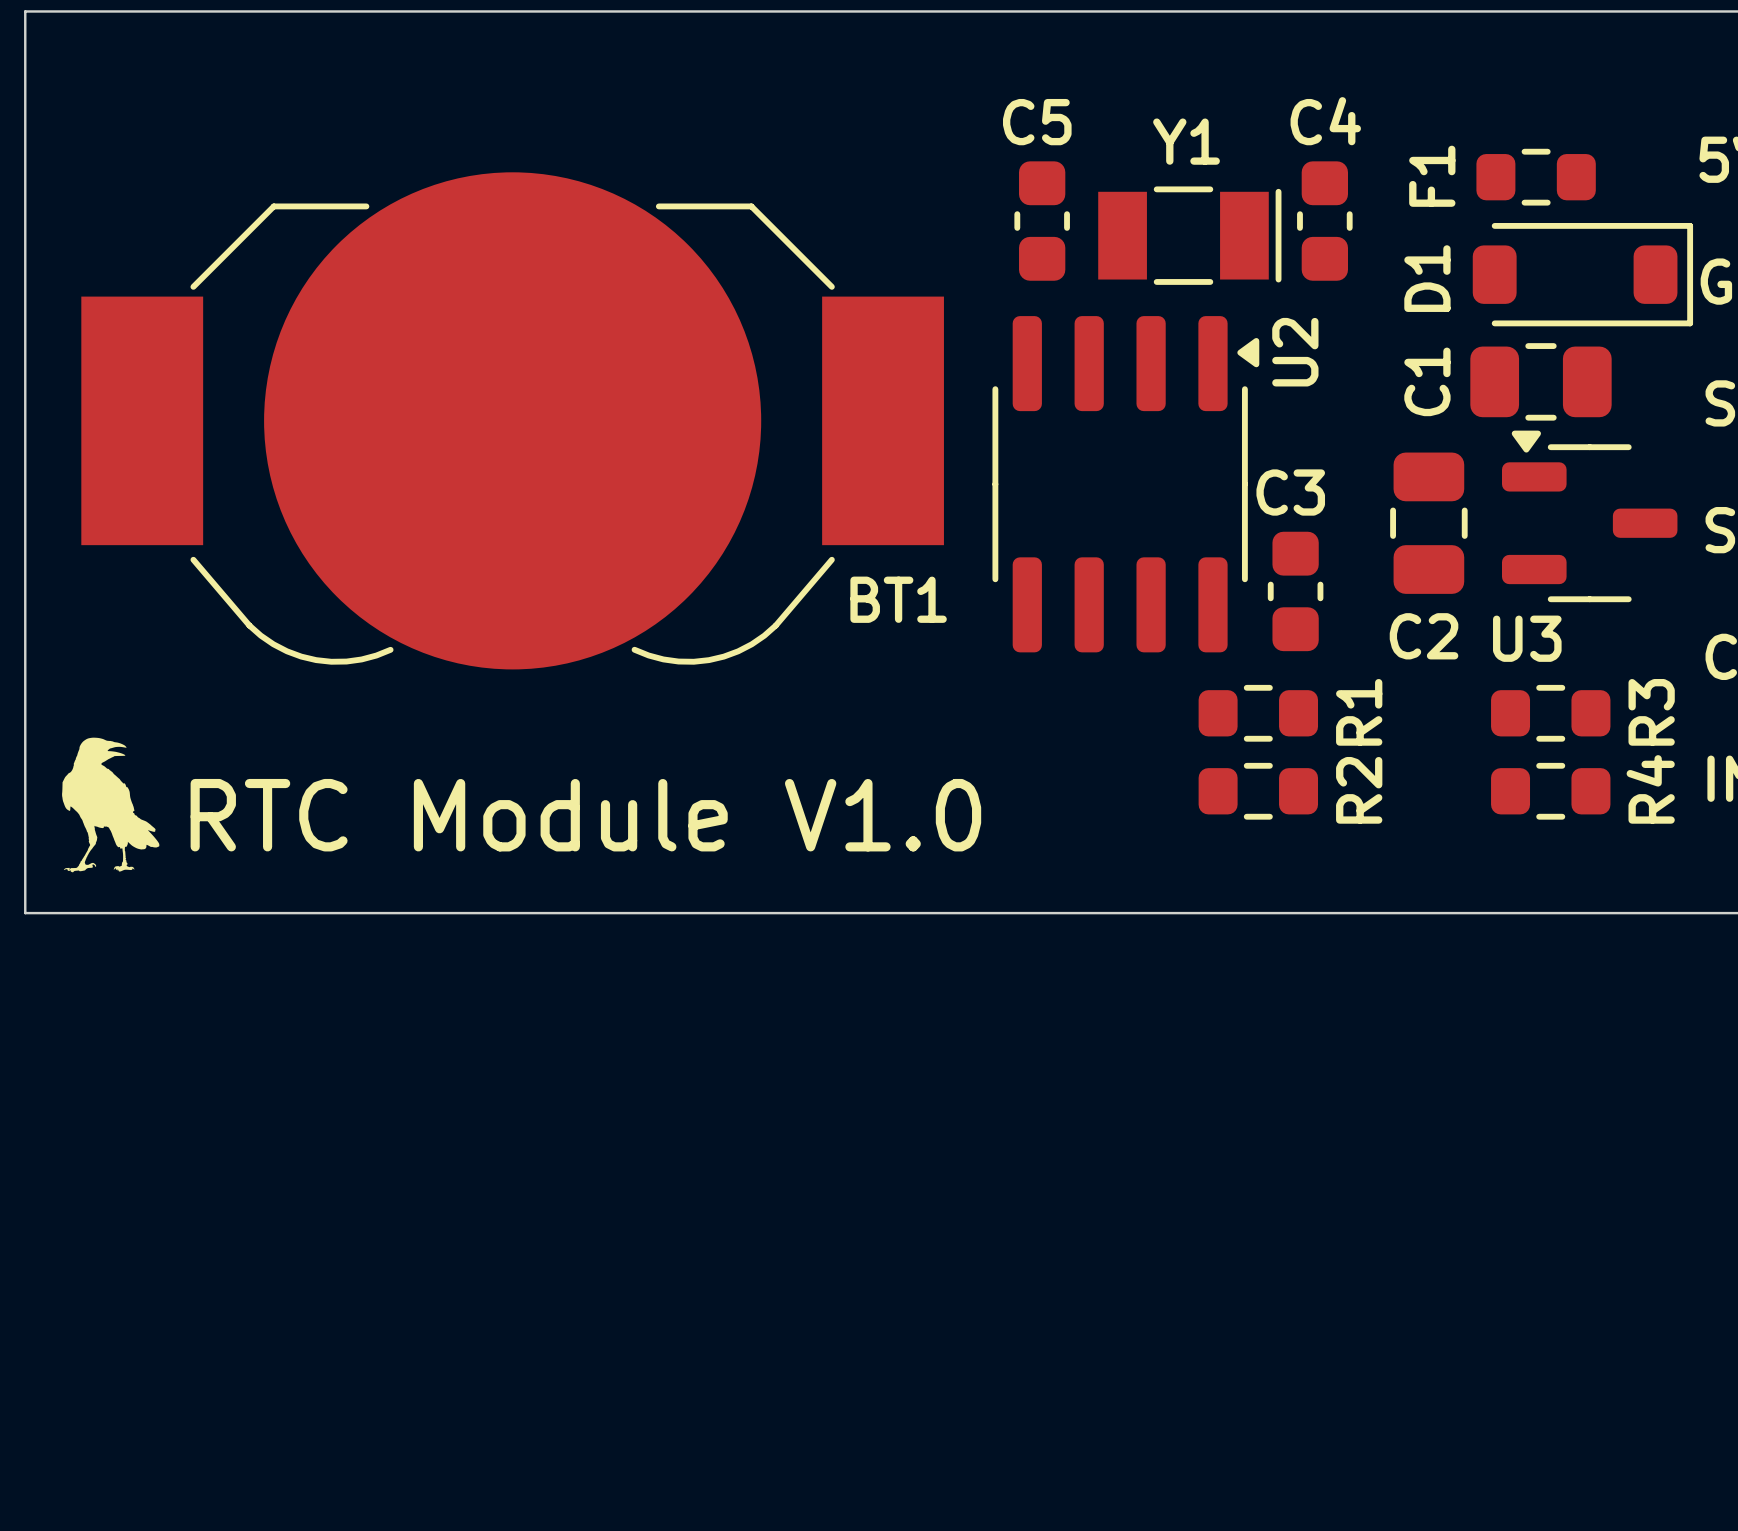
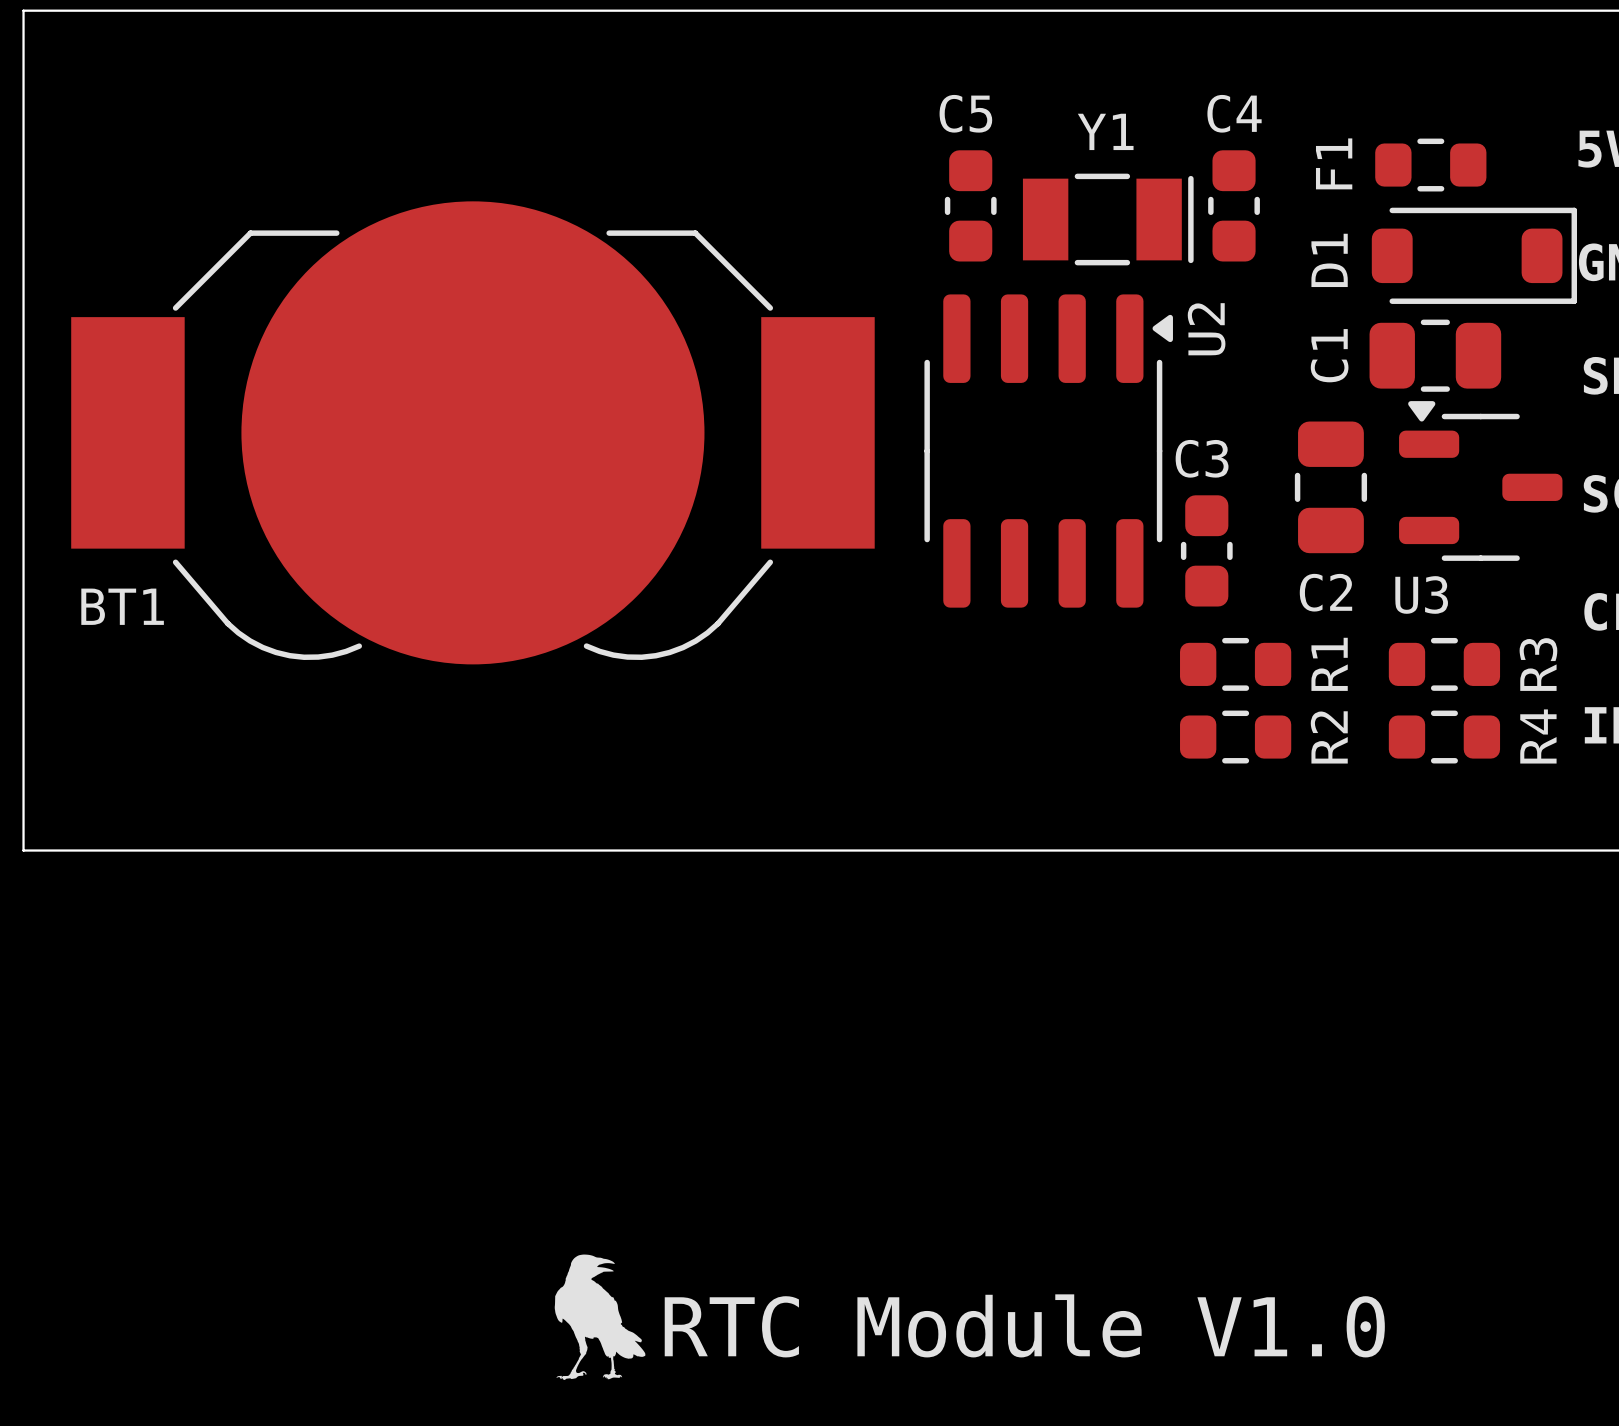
BT1 position: (512, 420) -> (472, 432)
BT1 name position: BT1 (898, 599) -> BT1 (122, 606)
R1 position: (1258, 713) -> (1235, 664)
R2 position: (1258, 791) -> (1235, 737)
drawing position: (110, 804) -> (600, 1317)
text position: RTC Module V1.0 (585, 815) -> RTC Module V1.0 (1024, 1325)

